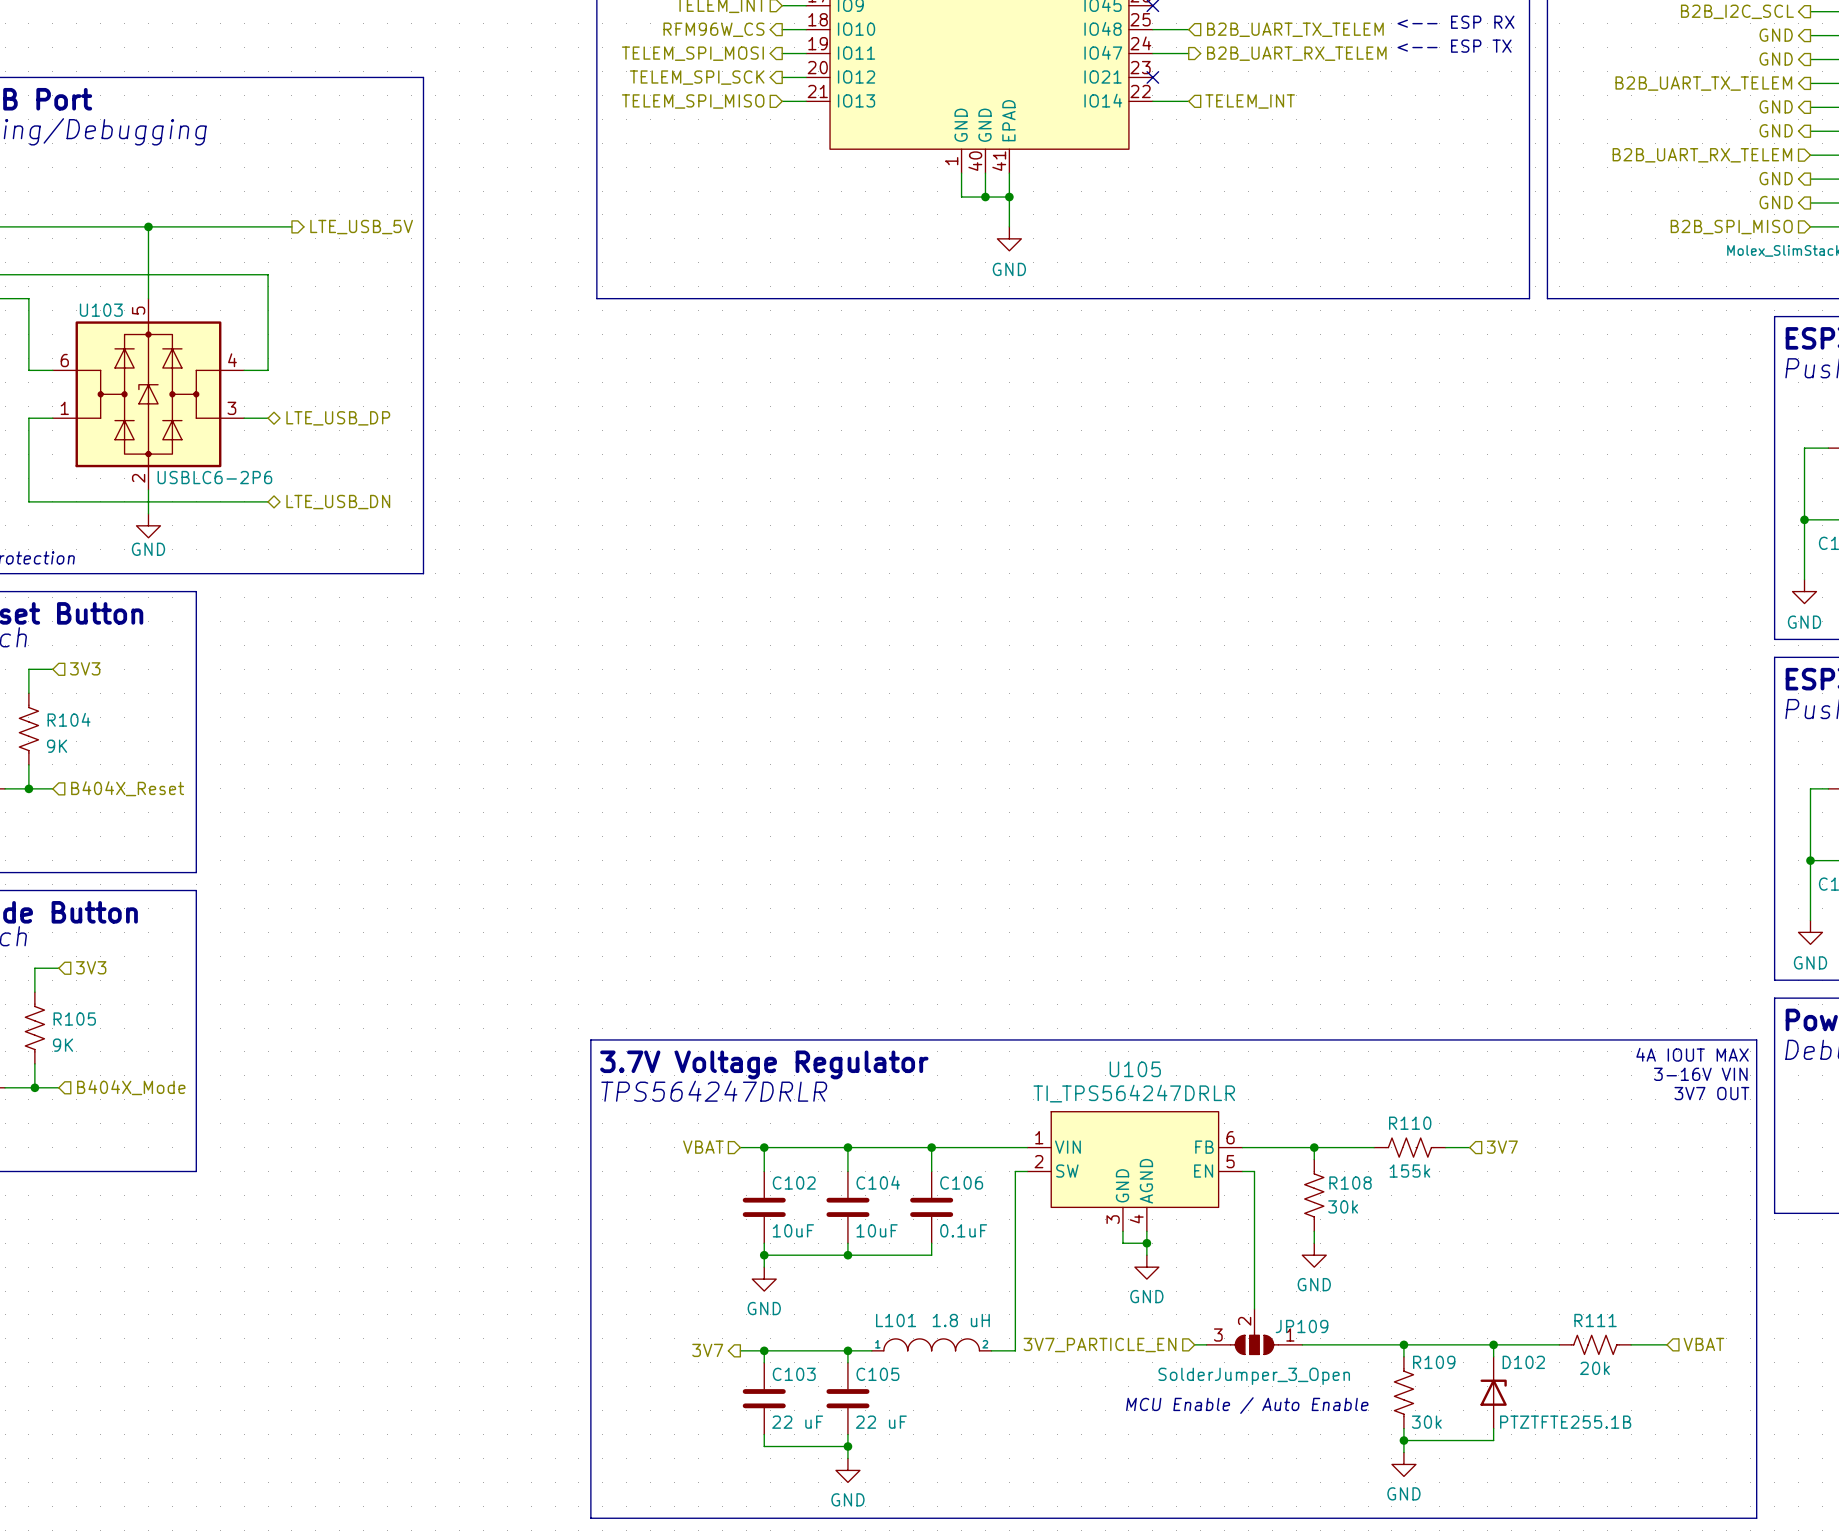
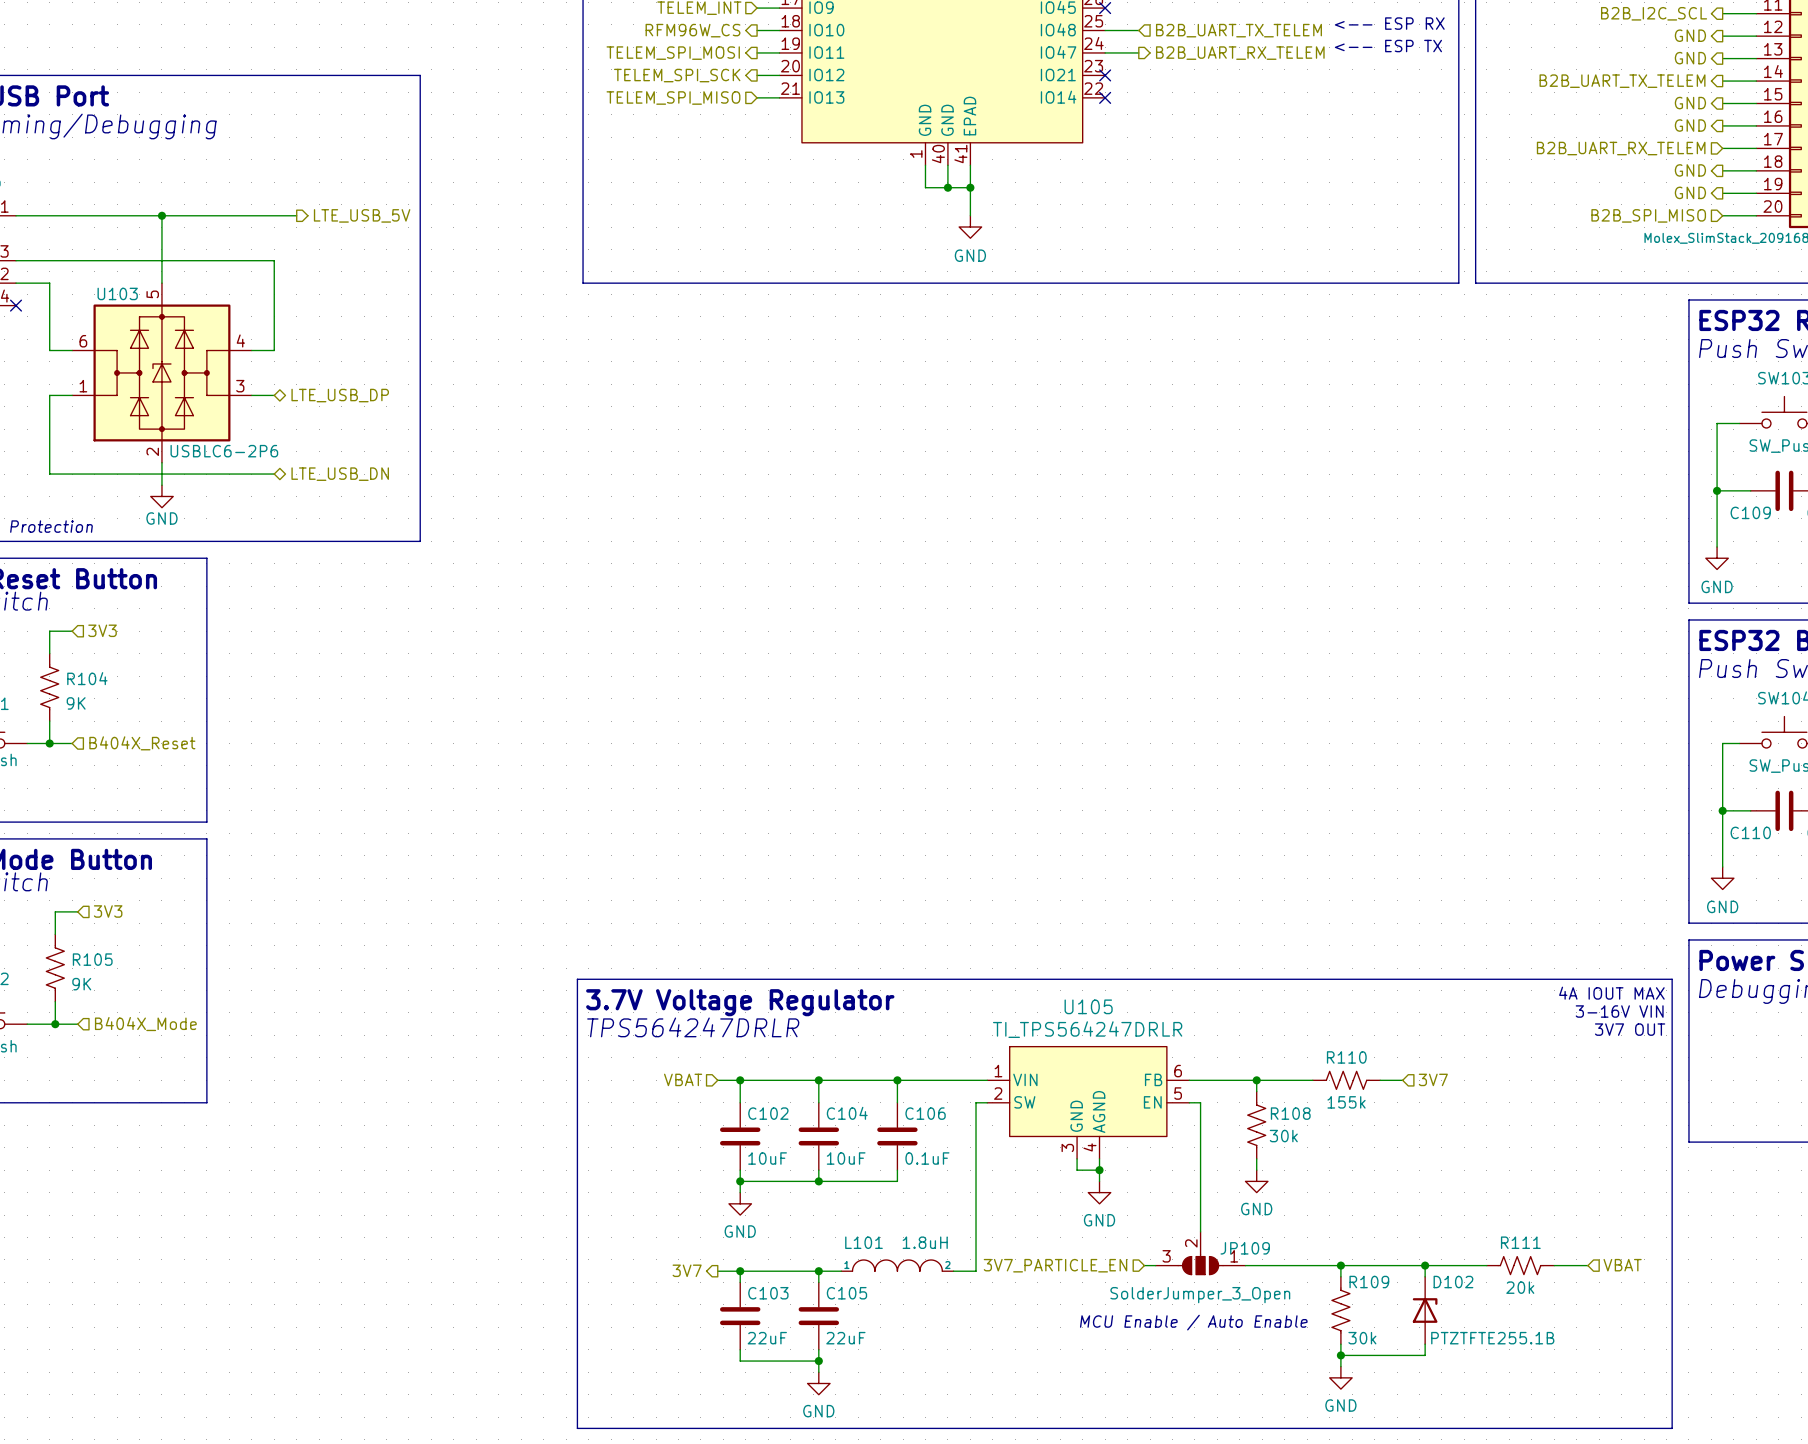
wire: (1152, 101) (1188, 101) -> none
no-connect mark: none -> (1105, 97)
hierarchical label: TELEM_INT (1250, 101) -> none
L101 value: 1.8 uH (961, 1320) -> 1.8uH (925, 1242)
C103 value: 22 uF (797, 1422) -> 22uF (767, 1338)
C105 value: 22 uF (881, 1422) -> 22uF (845, 1338)

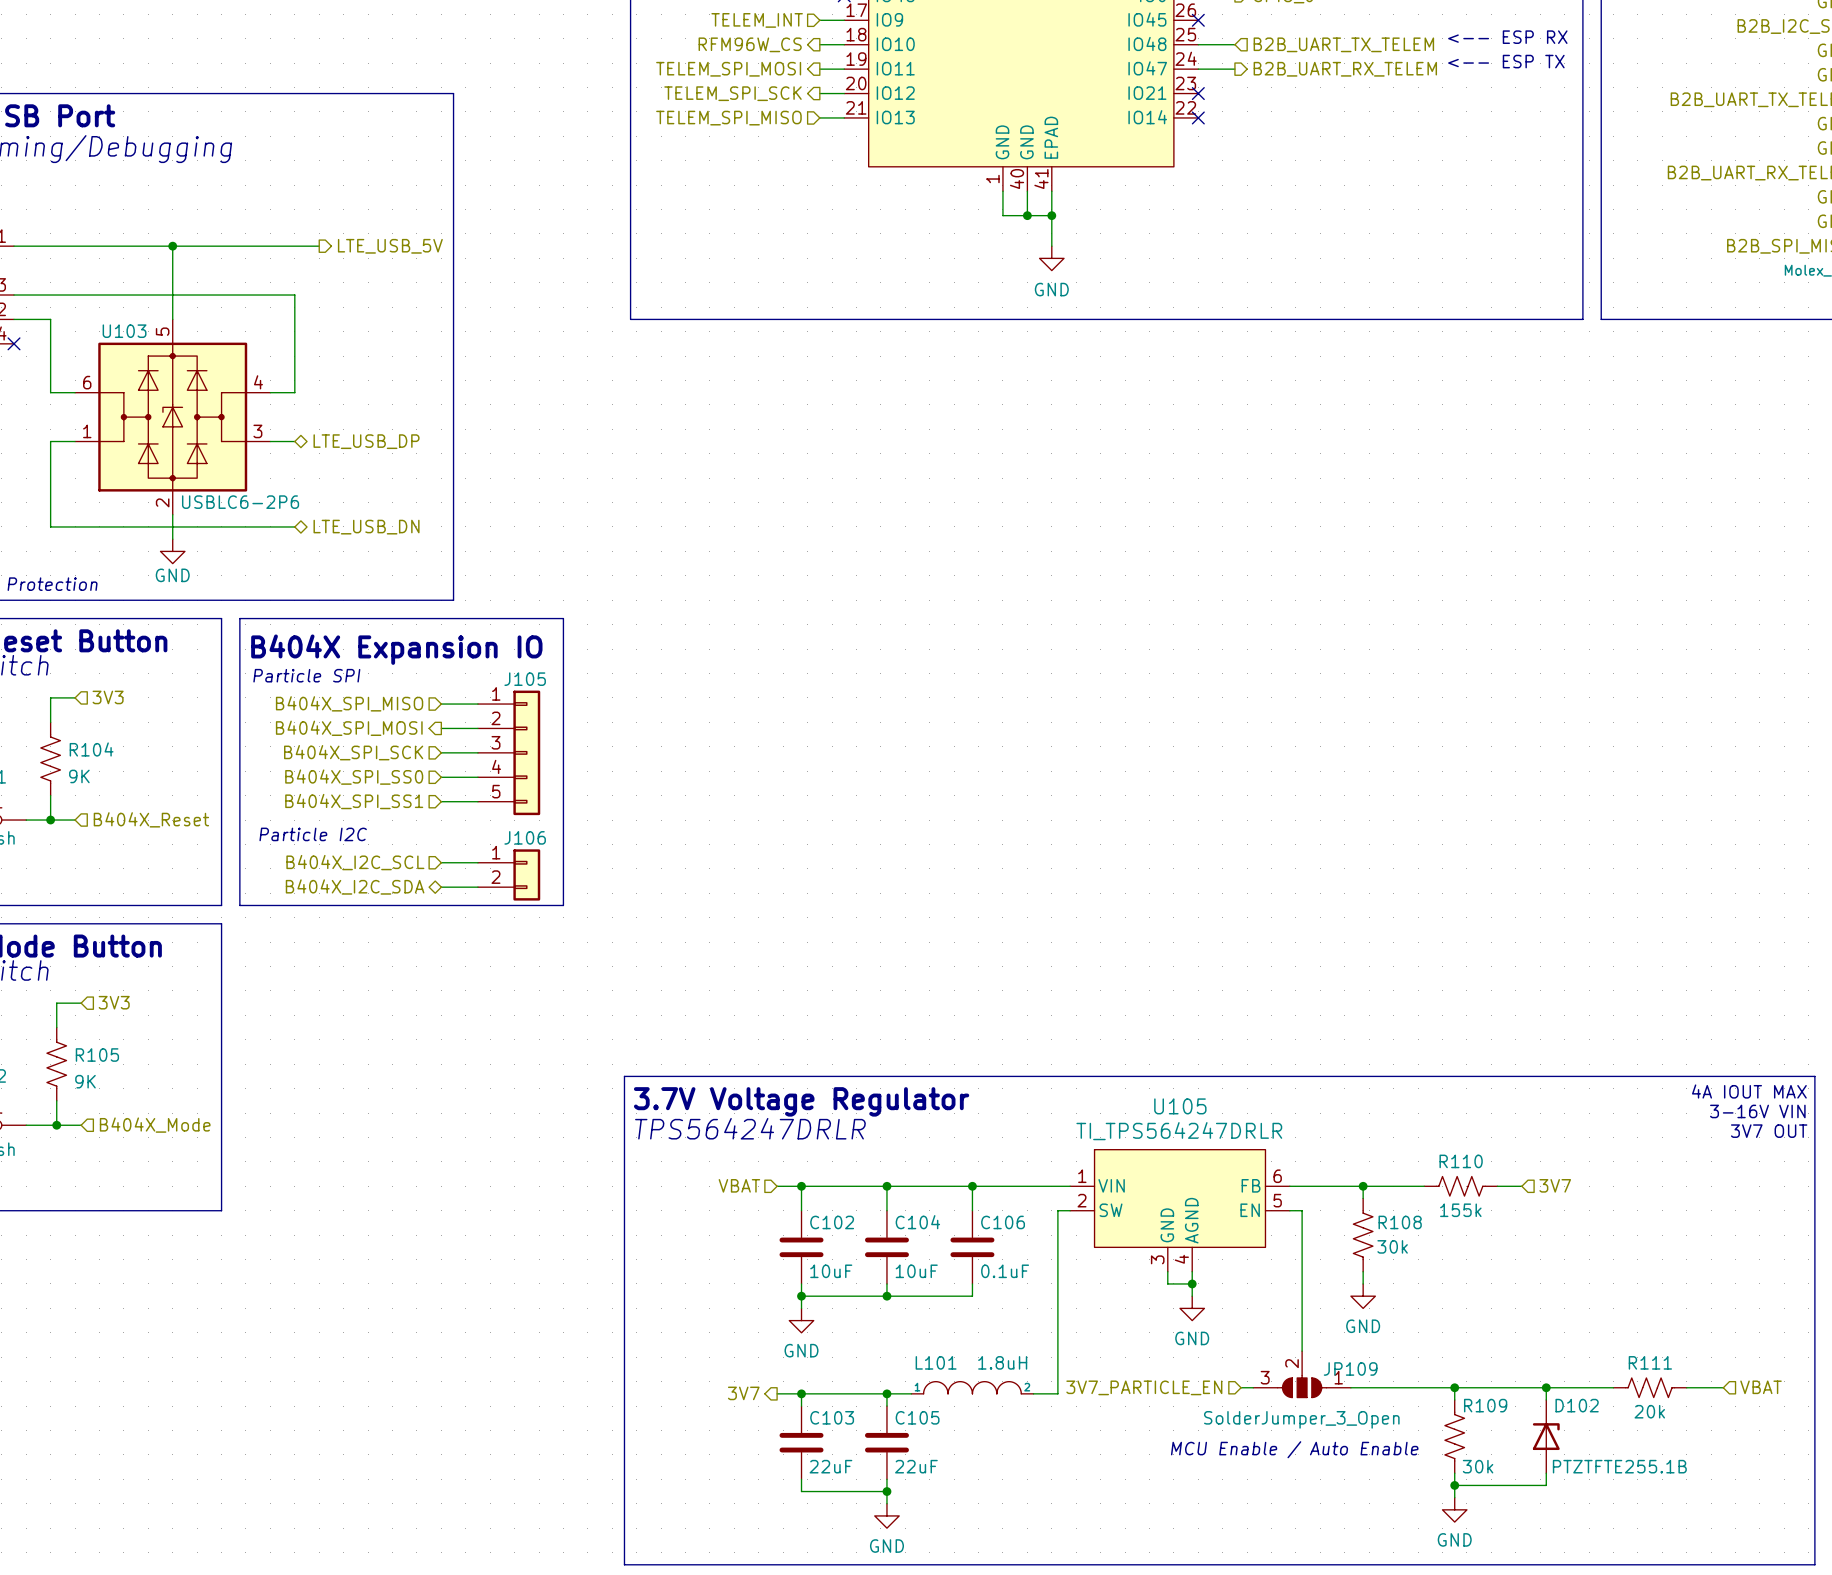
line: none -> (239, 618) (239, 905) (563, 905) (563, 618) (239, 618)
text: none -> B404X Expansion IO (396, 649)
text: none -> Particle SPI (306, 675)
hierarchical label: none -> B404X_SPI_MISO (349, 703)
wire: none -> (441, 704) (477, 704)
hierarchical label: none -> B404X_SPI_MOSI (349, 728)
wire: none -> (441, 728) (477, 728)
hierarchical label: none -> B404X_SPI_SCK (353, 752)
wire: none -> (441, 752) (477, 752)
J105: none -> (509, 752)
hierarchical label: none -> B404X_SPI_SS0 (354, 777)
wire: none -> (441, 777) (477, 777)
hierarchical label: none -> B404X_SPI_SS1 (354, 801)
wire: none -> (441, 801) (477, 801)
text: none -> Particle I2C (313, 834)
hierarchical label: none -> B404X_I2C_SCL (355, 862)
wire: none -> (441, 862) (477, 862)
J106: none -> (509, 874)
hierarchical label: none -> B404X_I2C_SDA (355, 887)
wire: none -> (441, 887) (477, 887)

